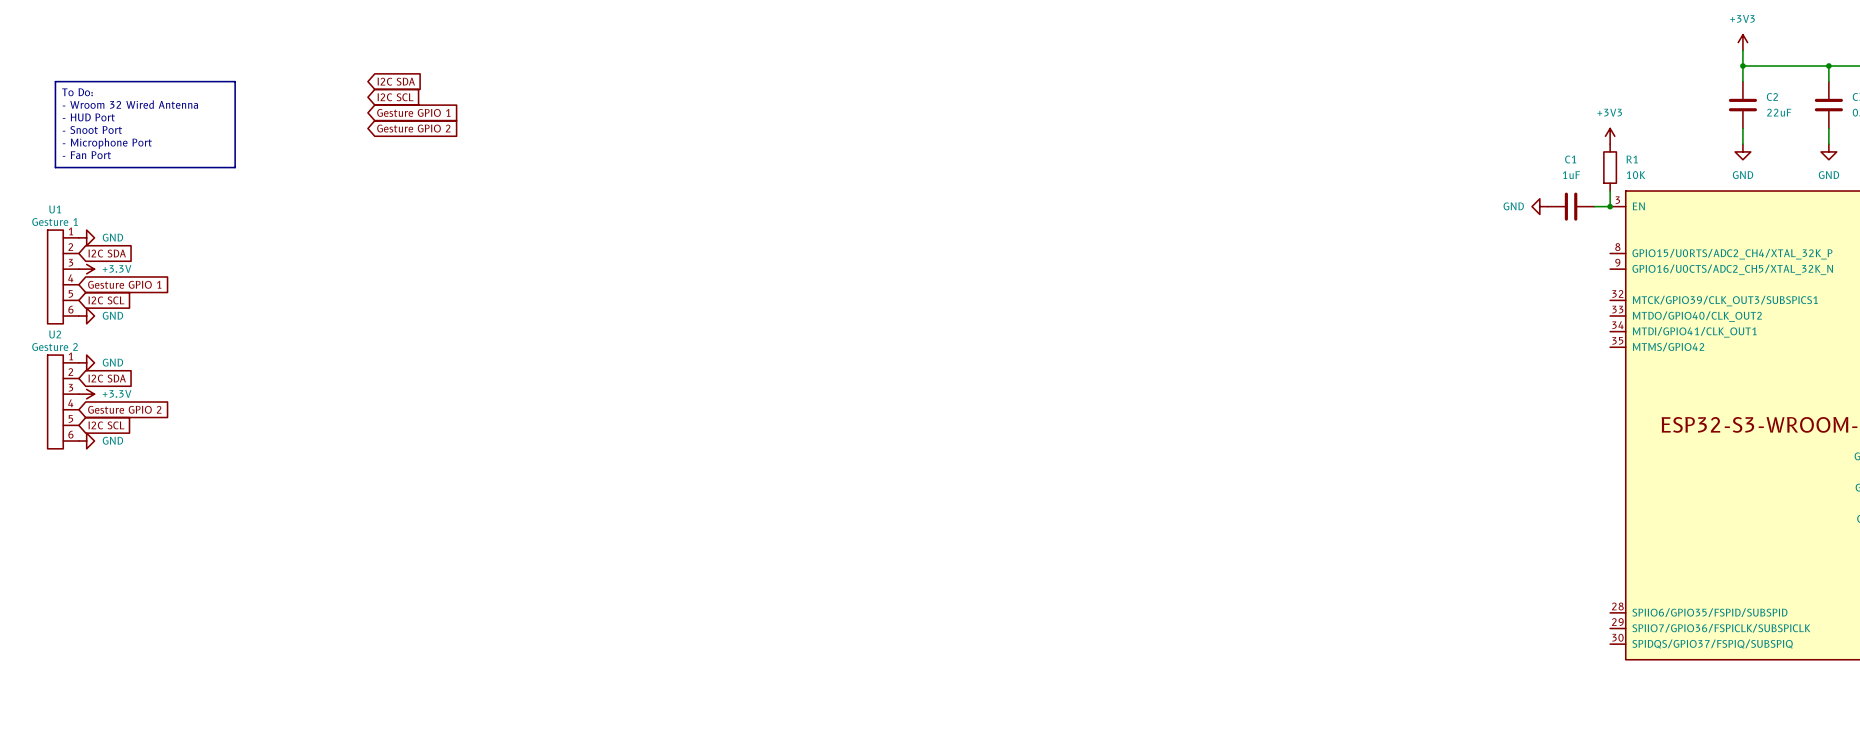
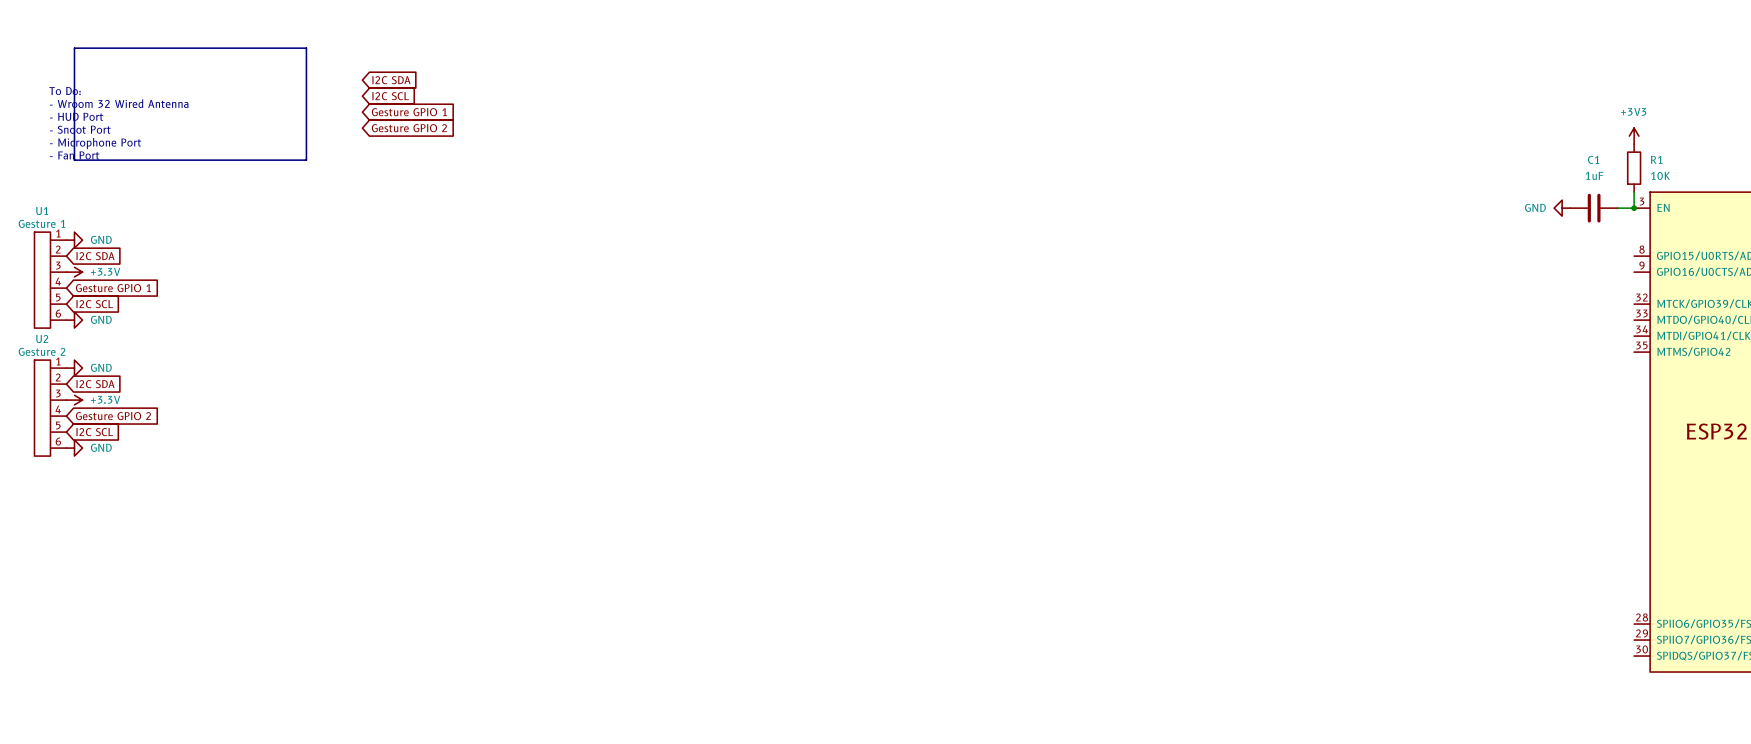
line: none -> (74, 48) (306, 48) (306, 160) (74, 160) (74, 48)
line: (55, 81) (235, 81) (235, 167) (55, 167) (55, 81) -> none

